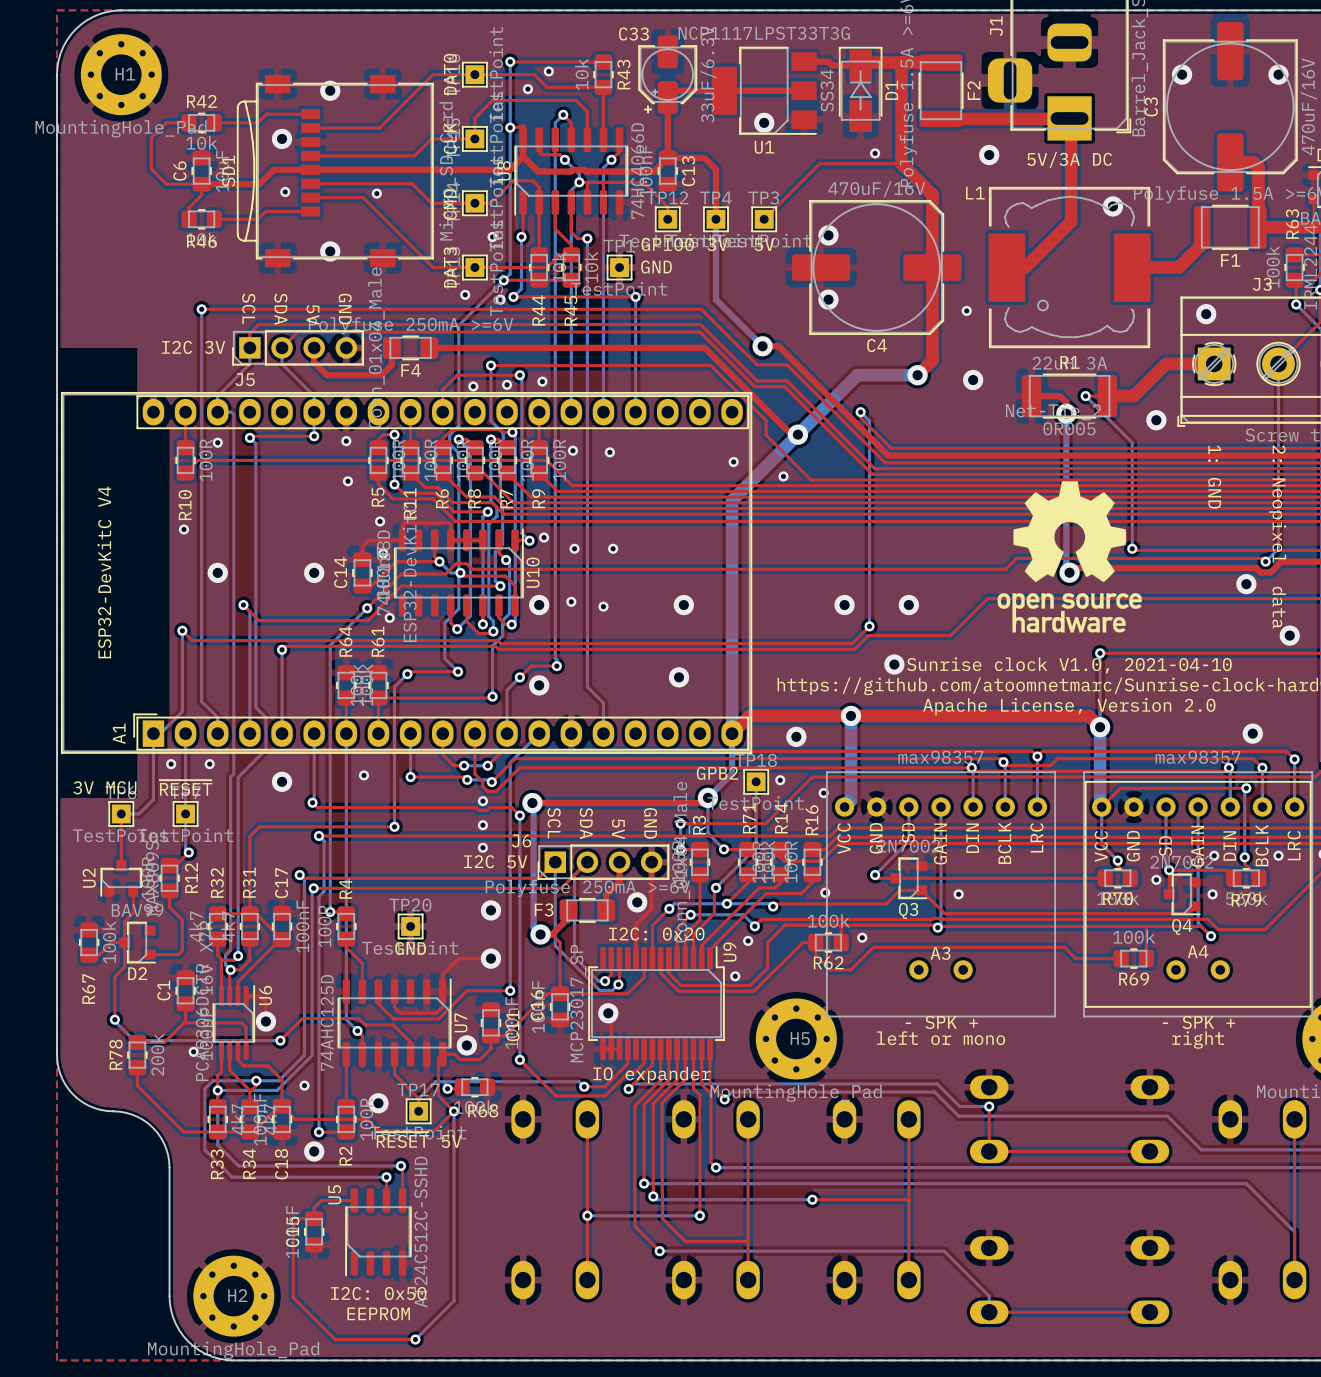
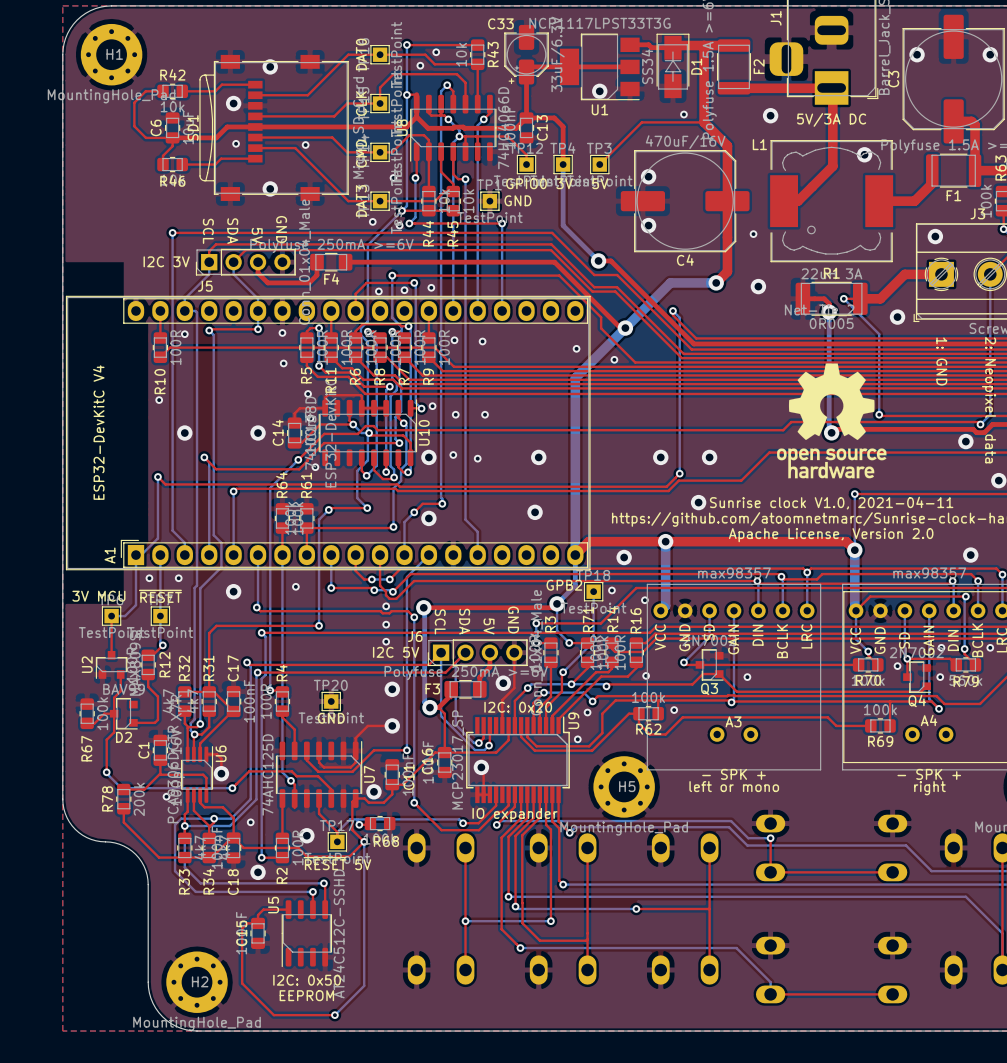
text: Sunrise clock V1.0, 2021-04-10 (1069, 665) -> Sunrise clock V1.0, 2021-04-11 (831, 503)

